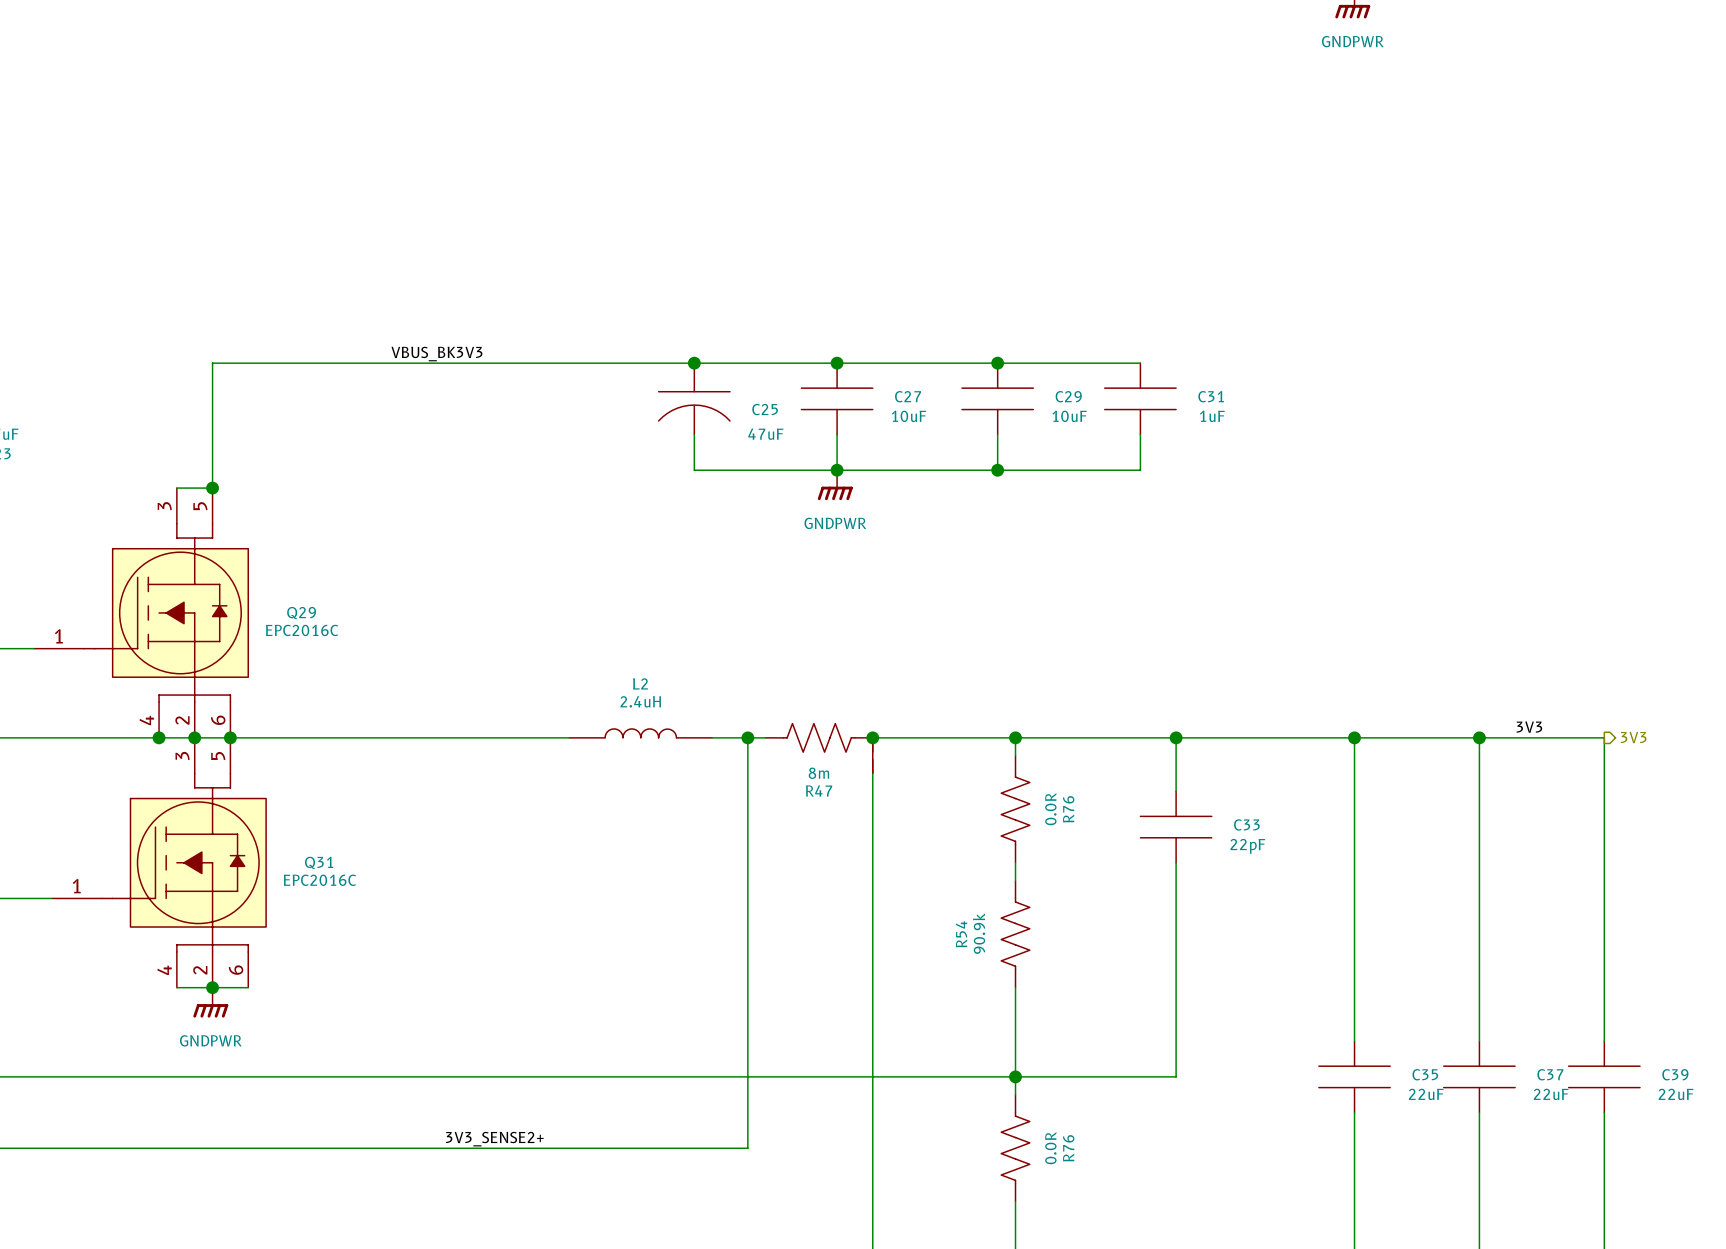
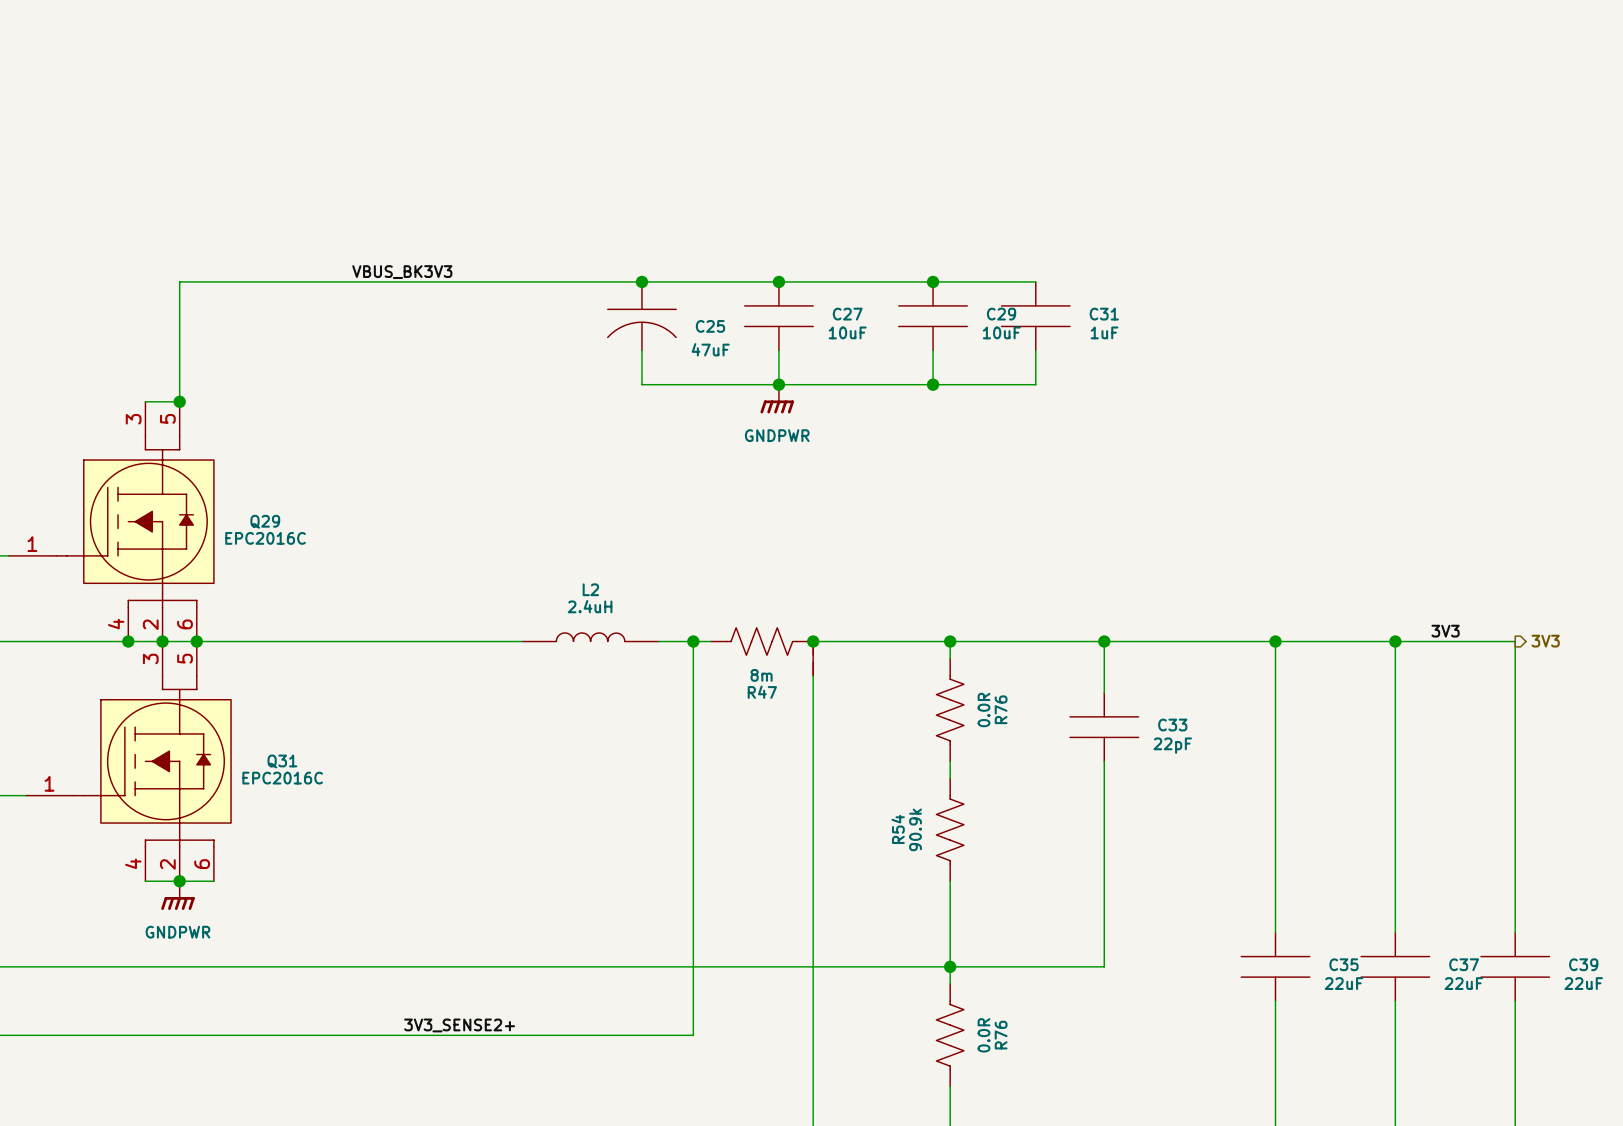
wire: (1104, 363) (1140, 363) -> none
C31 position: (1140, 398) -> (1035, 316)
wire: (1140, 434) (1140, 470) (1104, 470) -> (1035, 350) (1035, 384)

